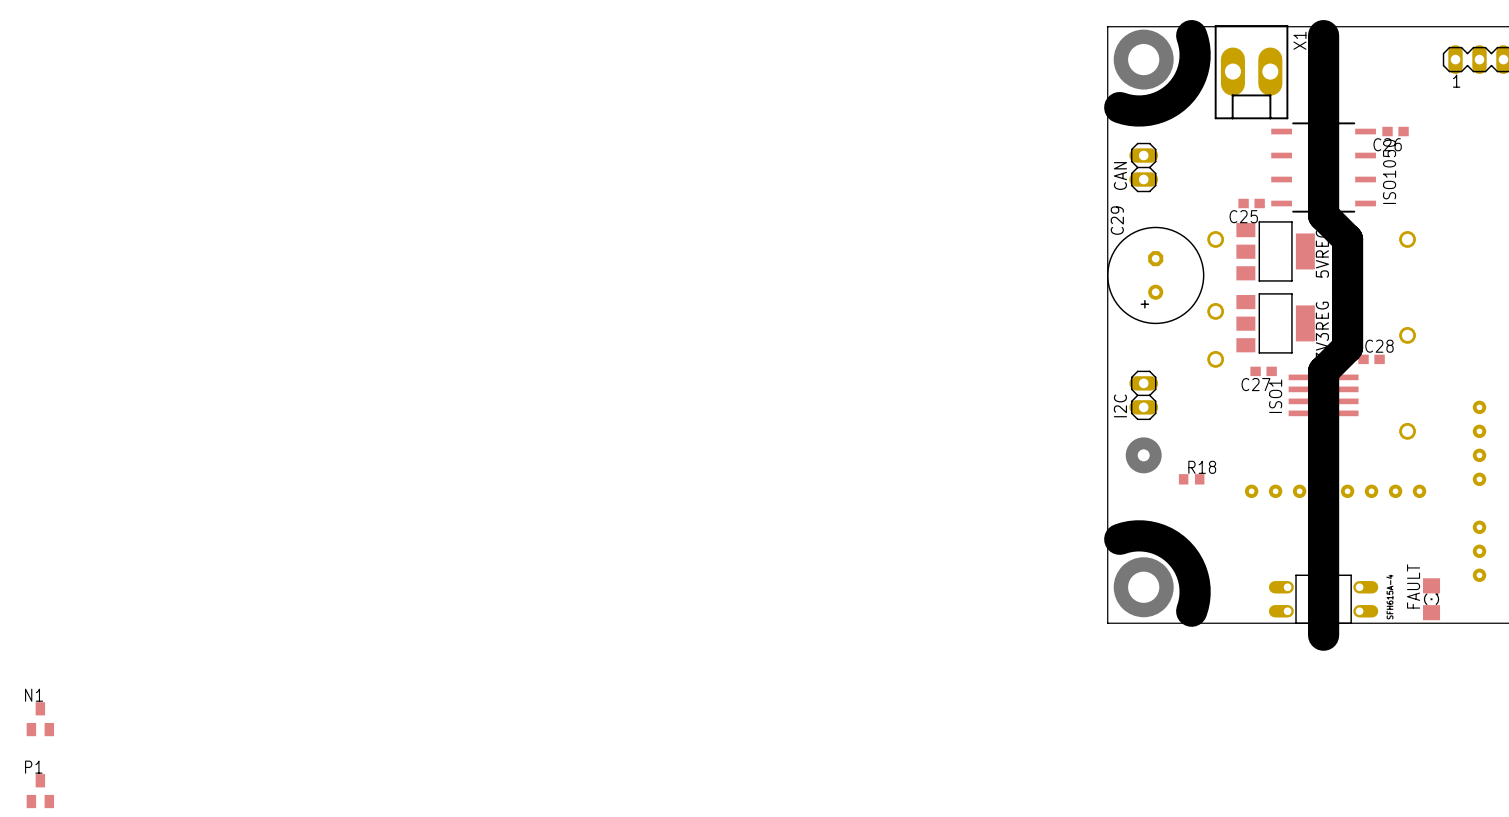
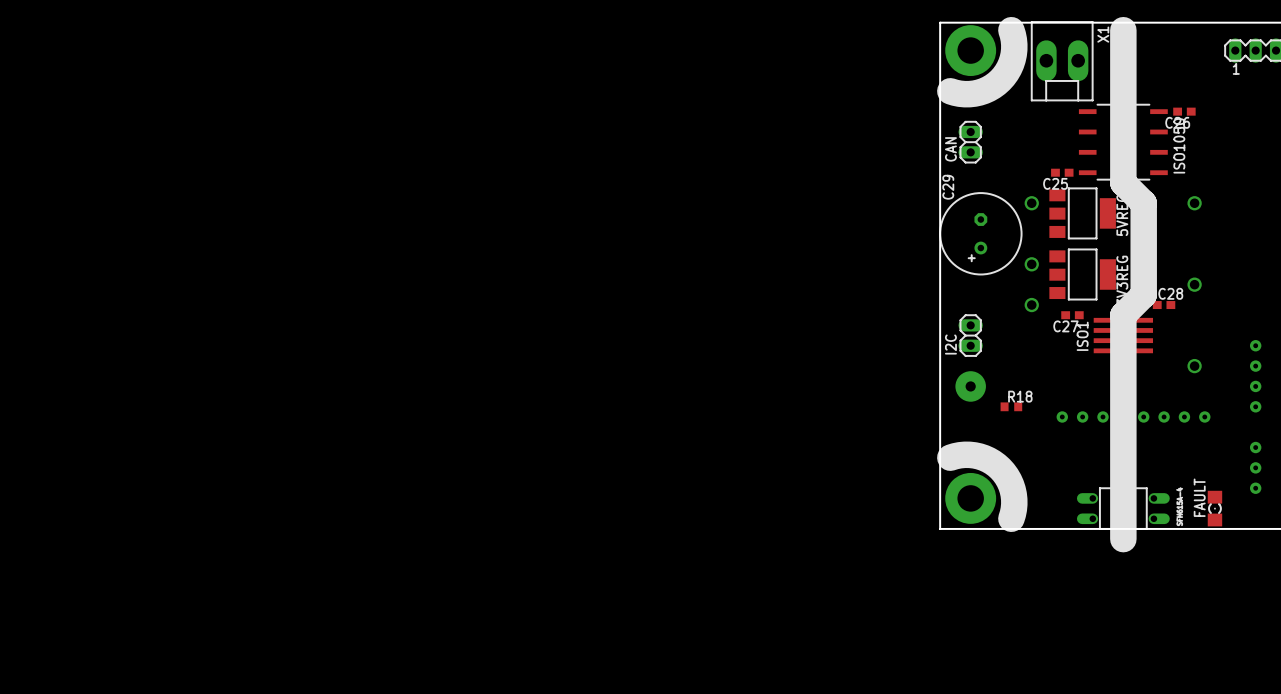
N1: (40, 719) -> none
P1: (40, 791) -> none

